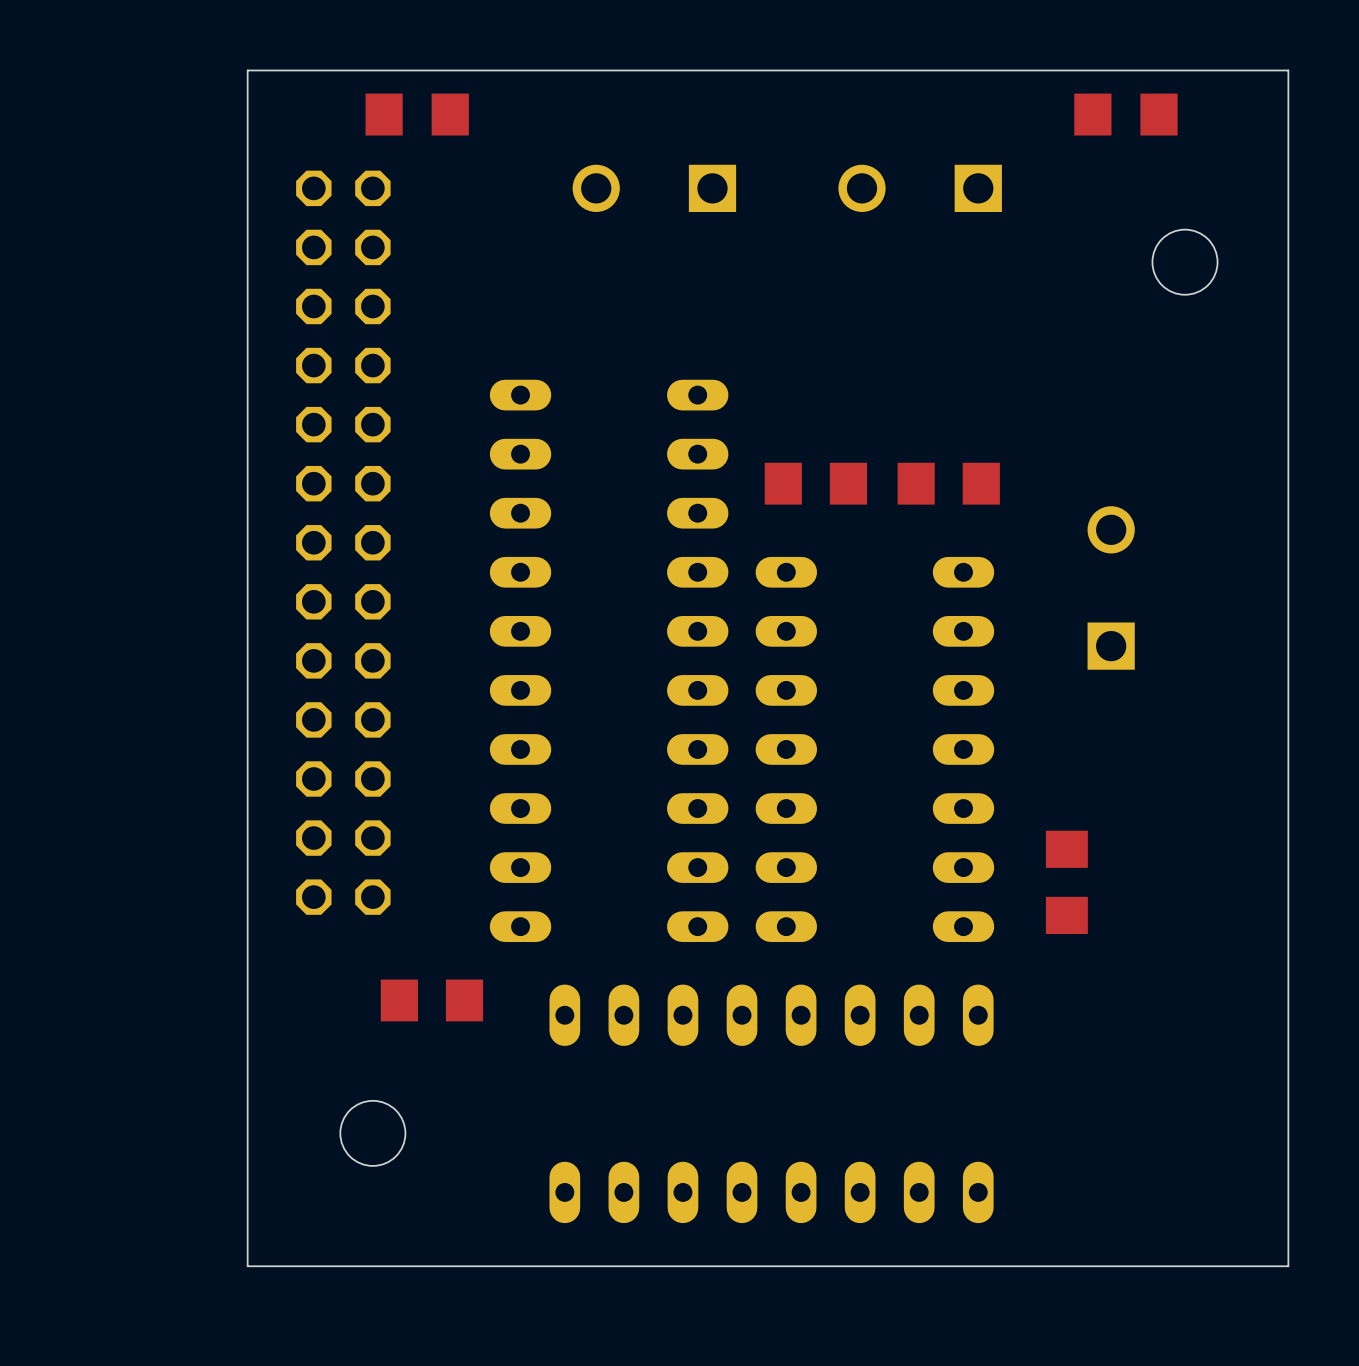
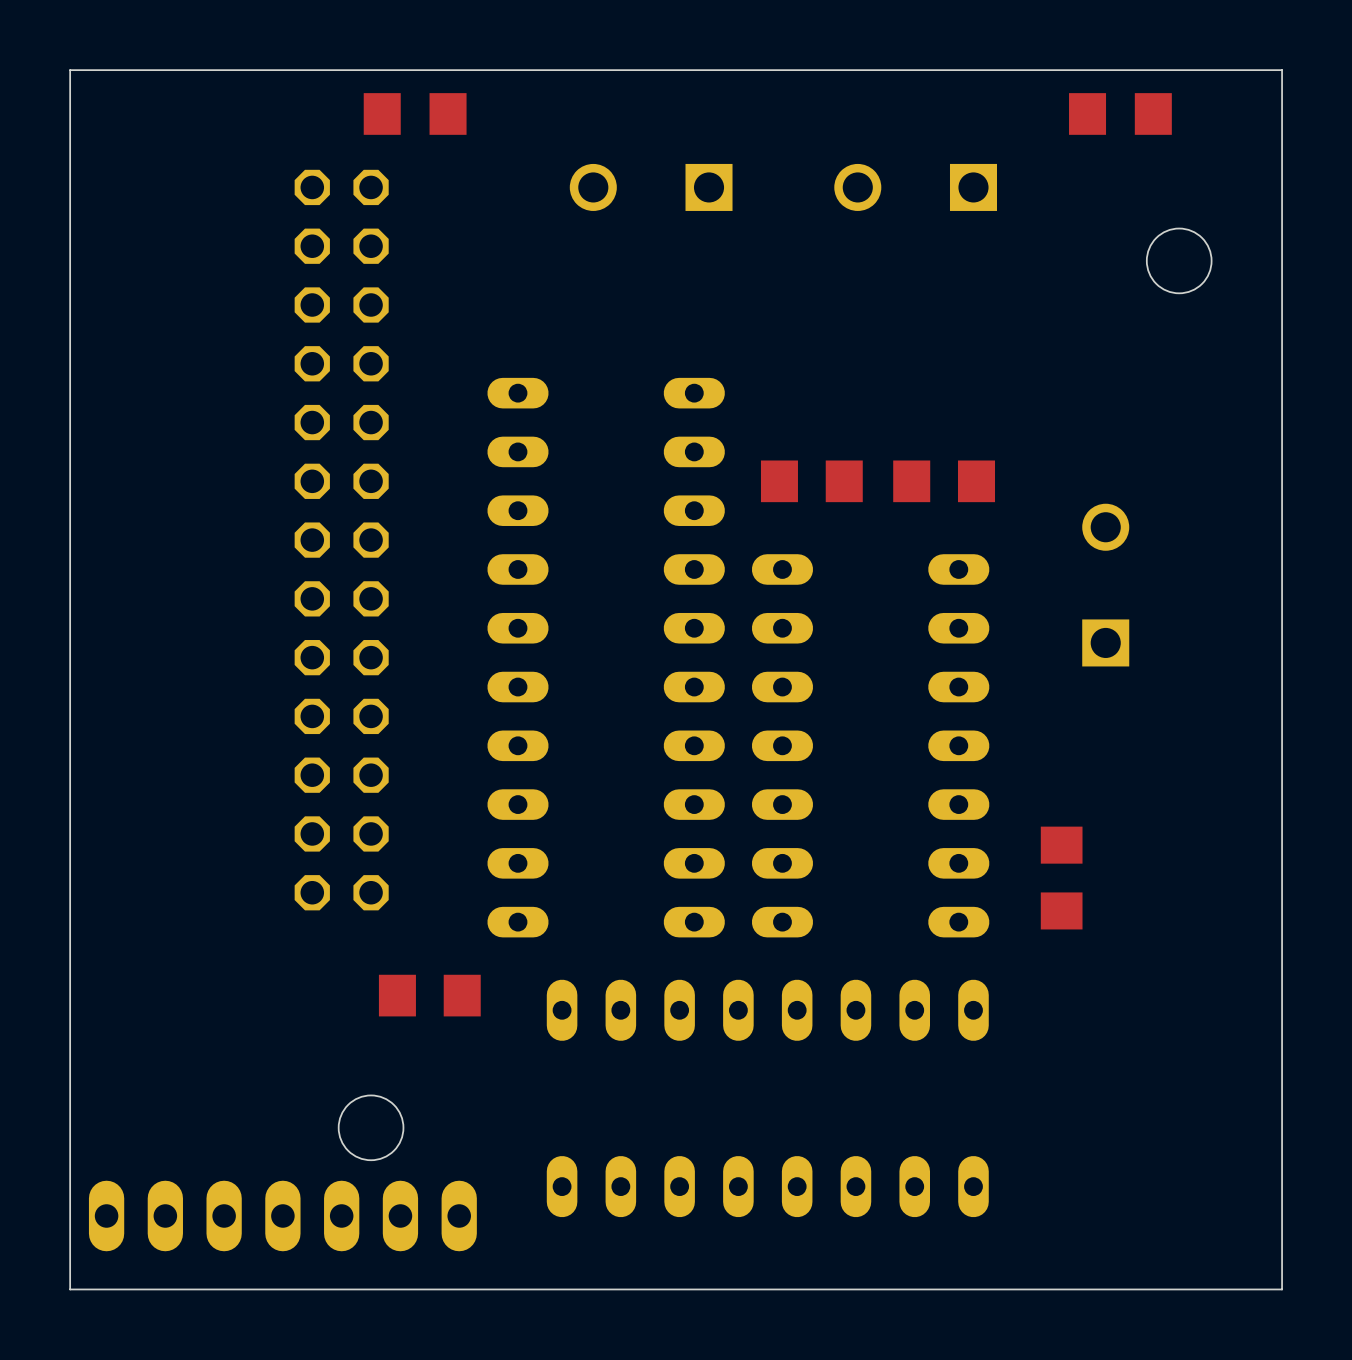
board edge: (247, 70) (247, 1266) (1288, 1266) -> (246, 70) (70, 70) (70, 1289) (1282, 1289) (1282, 1260)
part: none -> (282, 1215)

